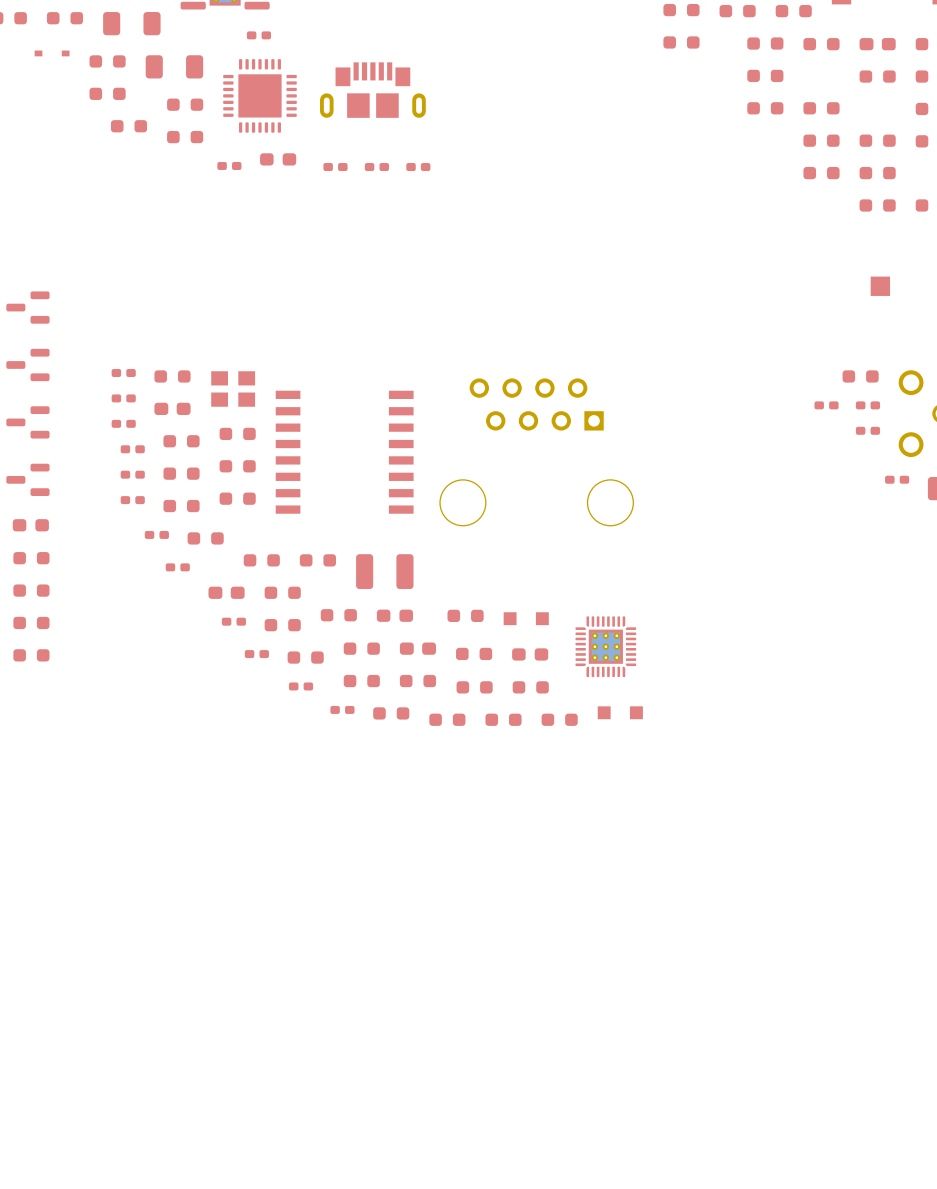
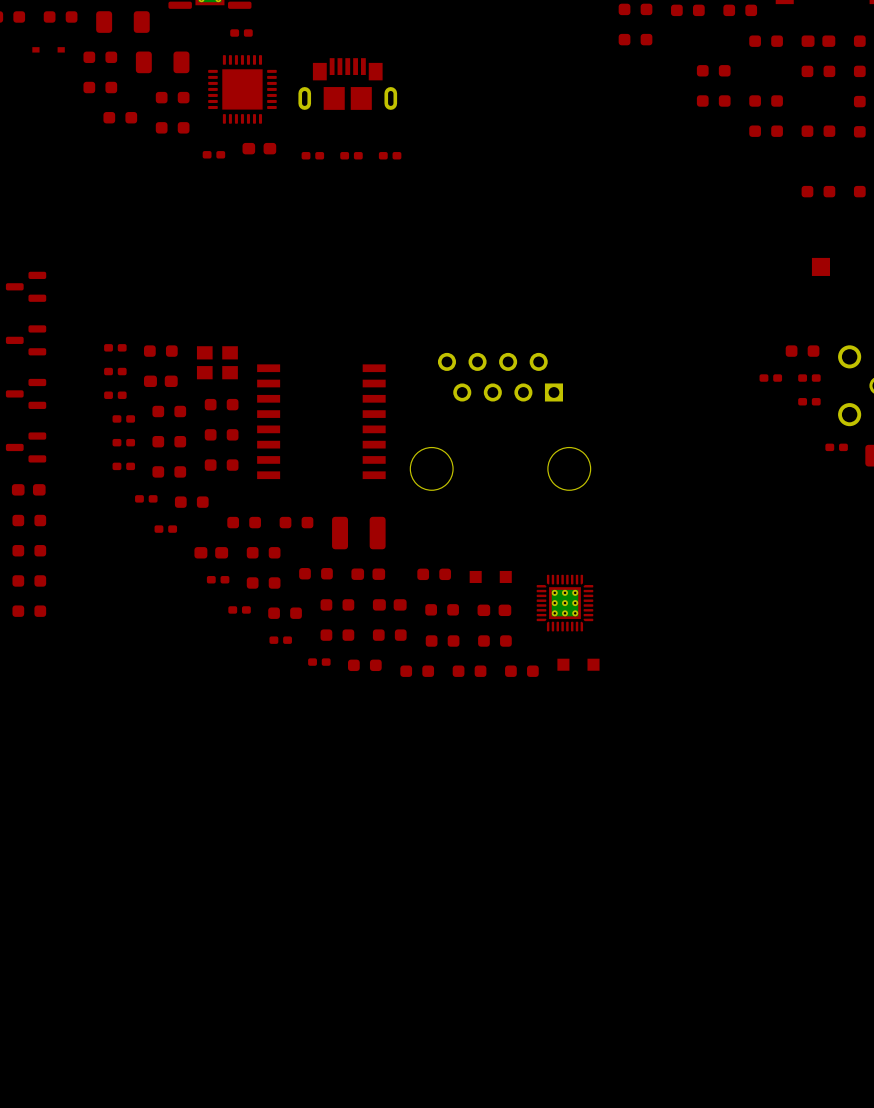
part: (765, 43) -> none
part: (821, 173) -> none
part: (877, 173) -> none

